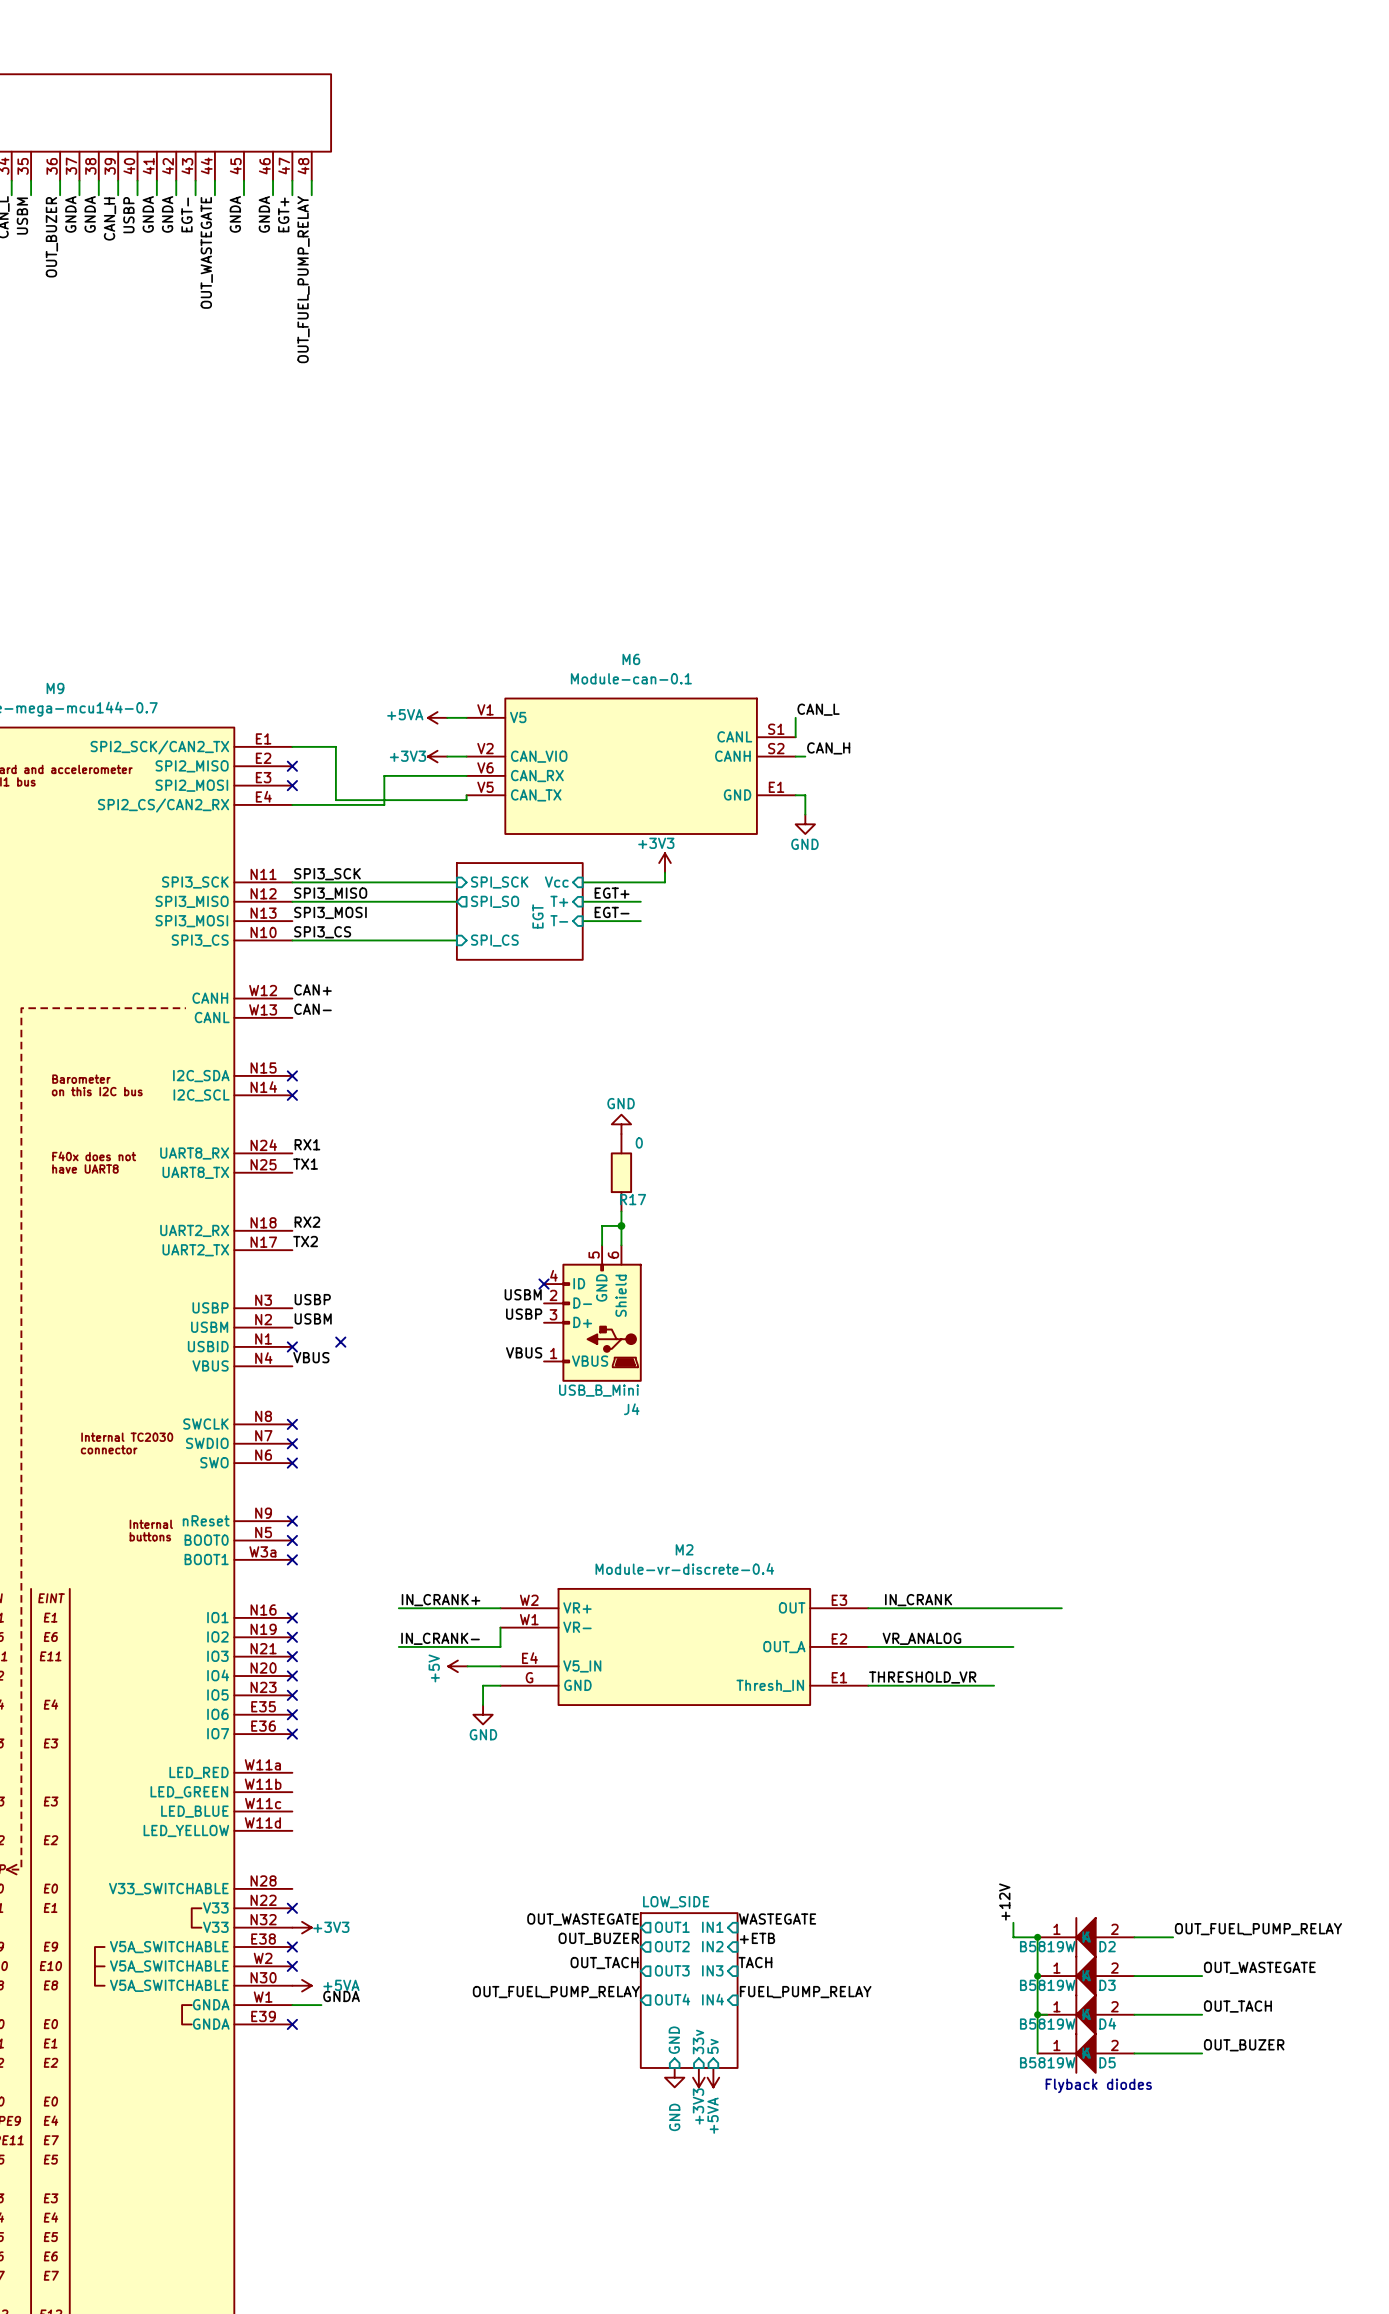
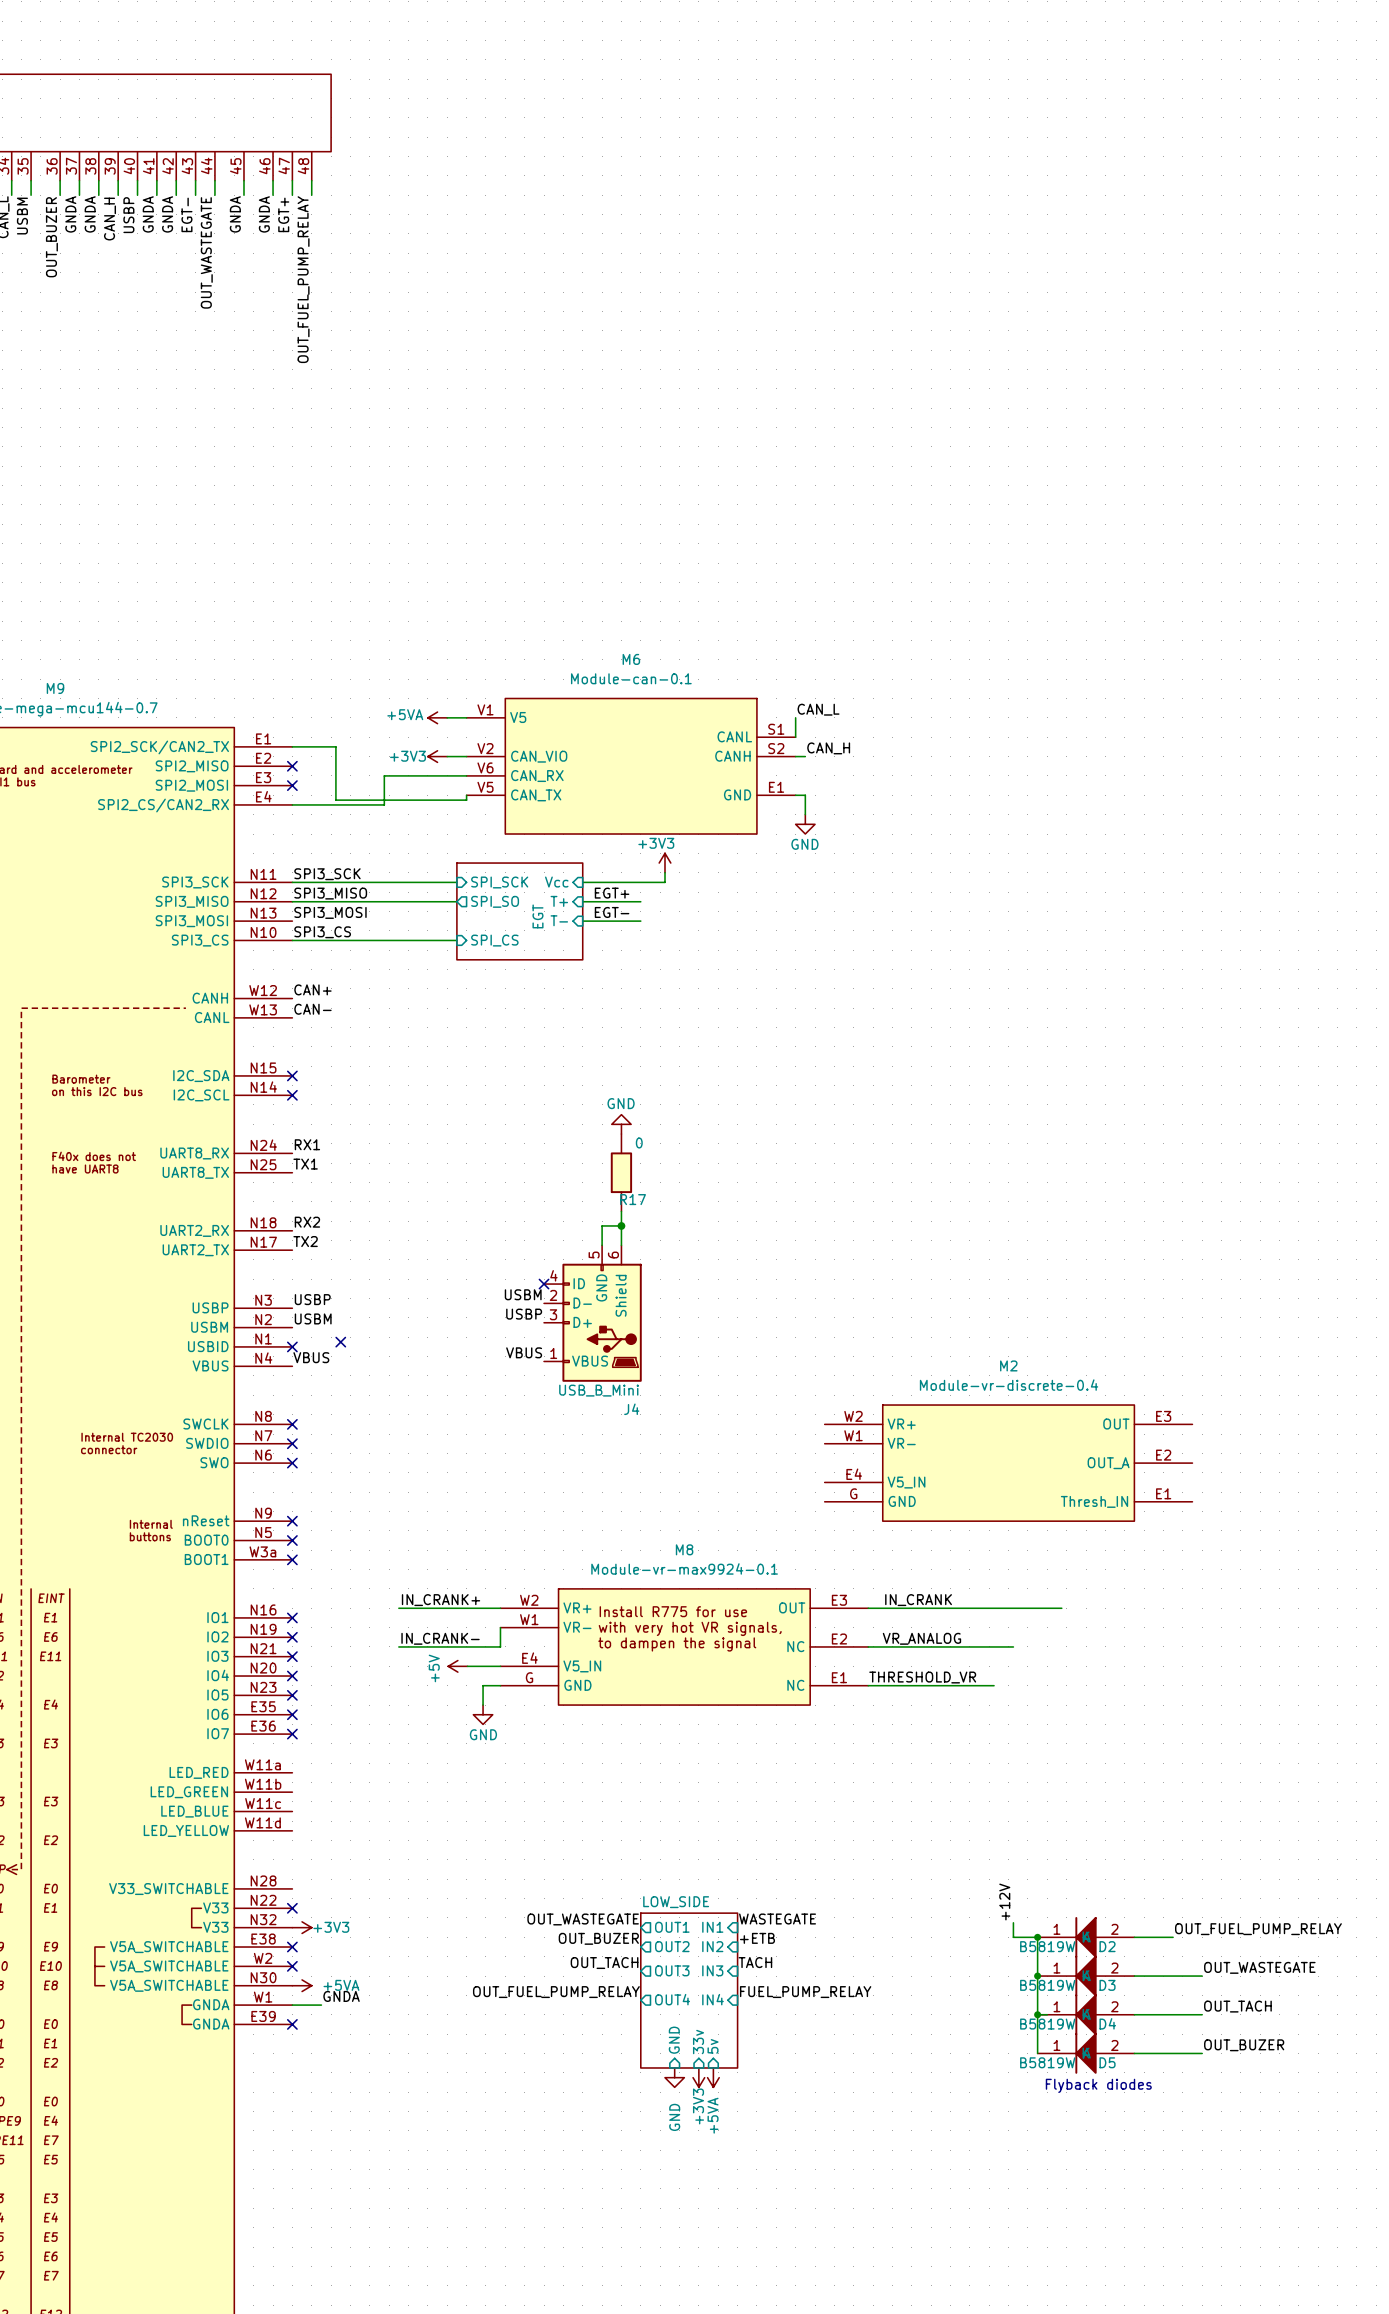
M2 position: (684, 1646) -> (1008, 1463)
M8: none -> Module-vr-max9924-0.1 (684, 1646)

